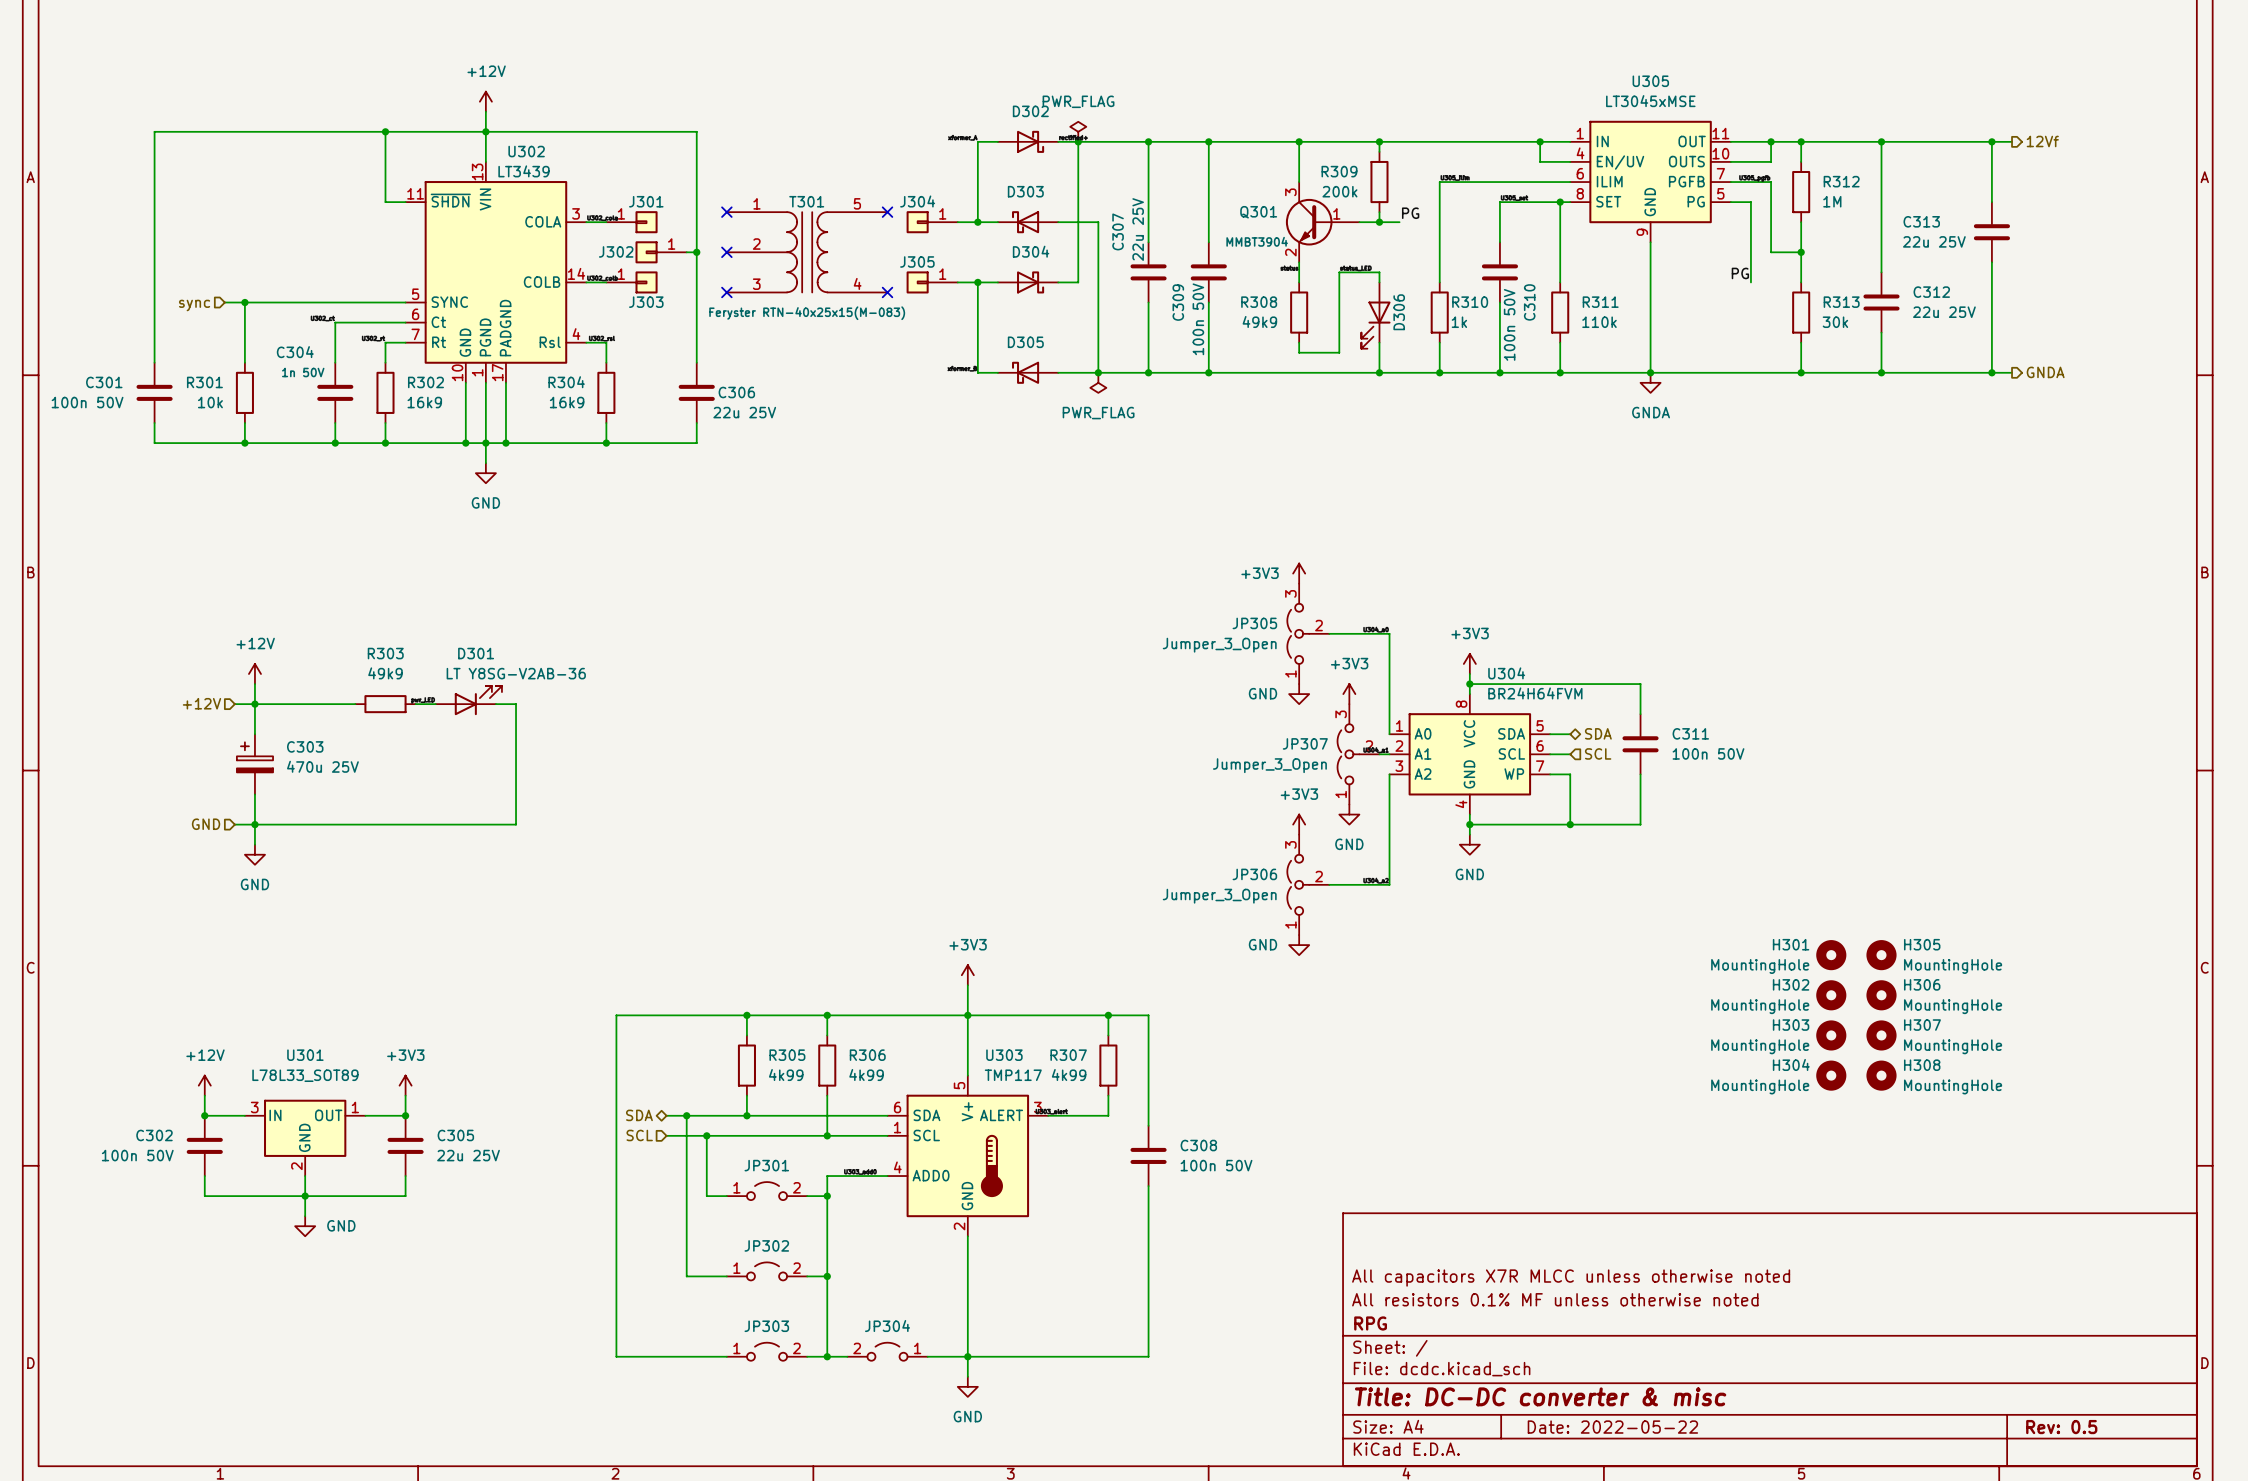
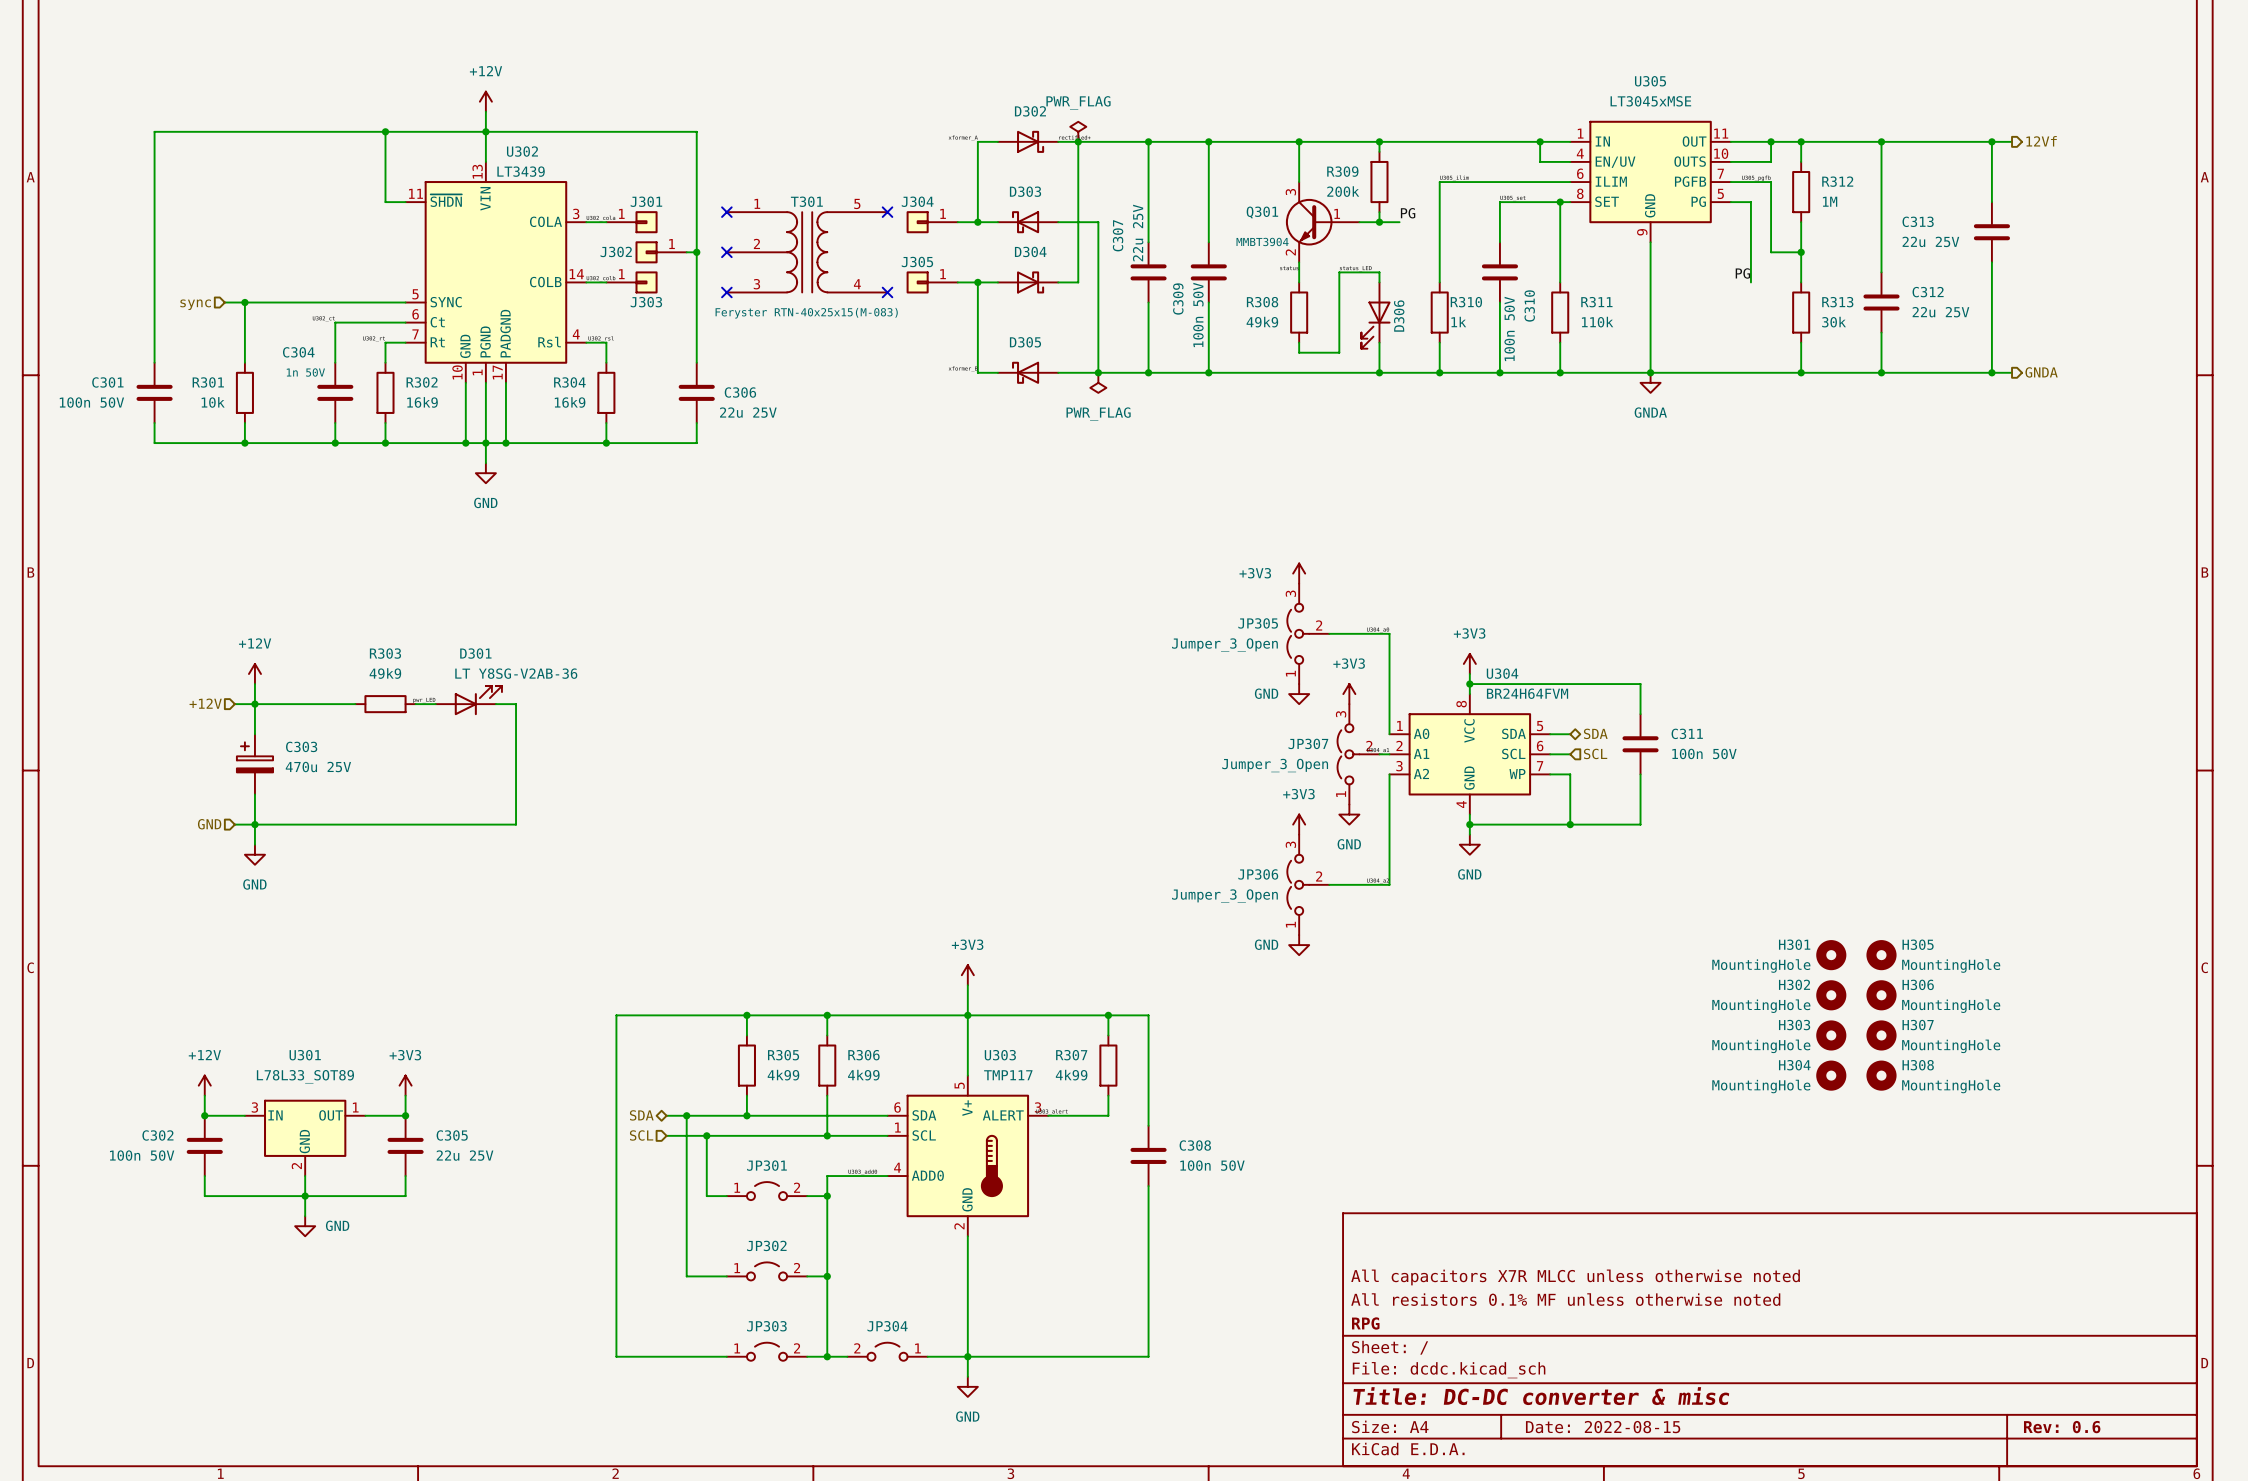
title block: Date: 2022-05-22 (1612, 1427) -> Date: 2022-08-15 (1603, 1427)
title block: Rev: 0.5 (2061, 1427) -> Rev: 0.6 (2062, 1427)

